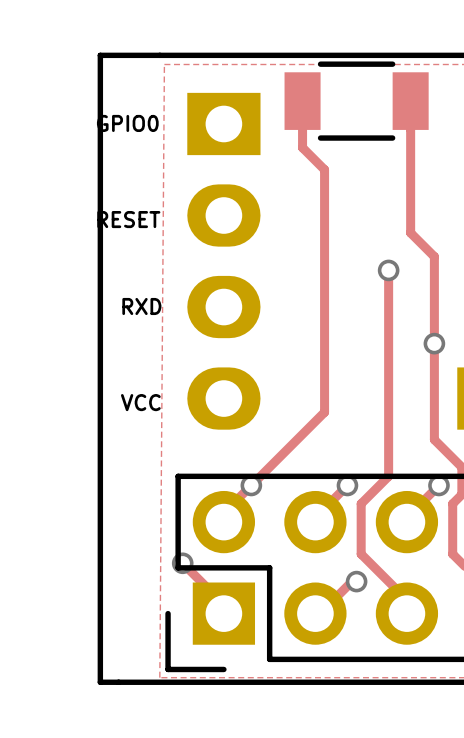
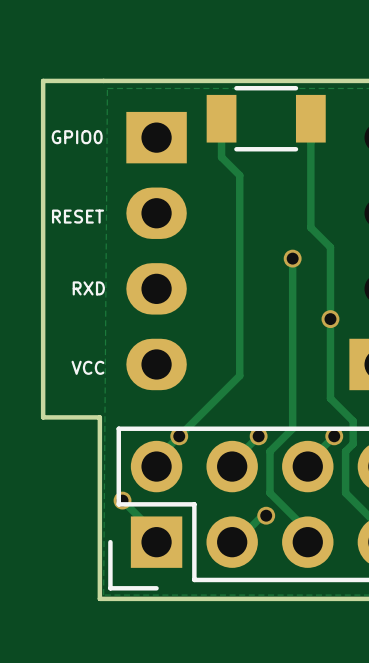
board edge: (100, 55) (100, 682) (155, 682) -> (54, 80) (43, 80) (43, 417) (99, 417) (99, 598)

